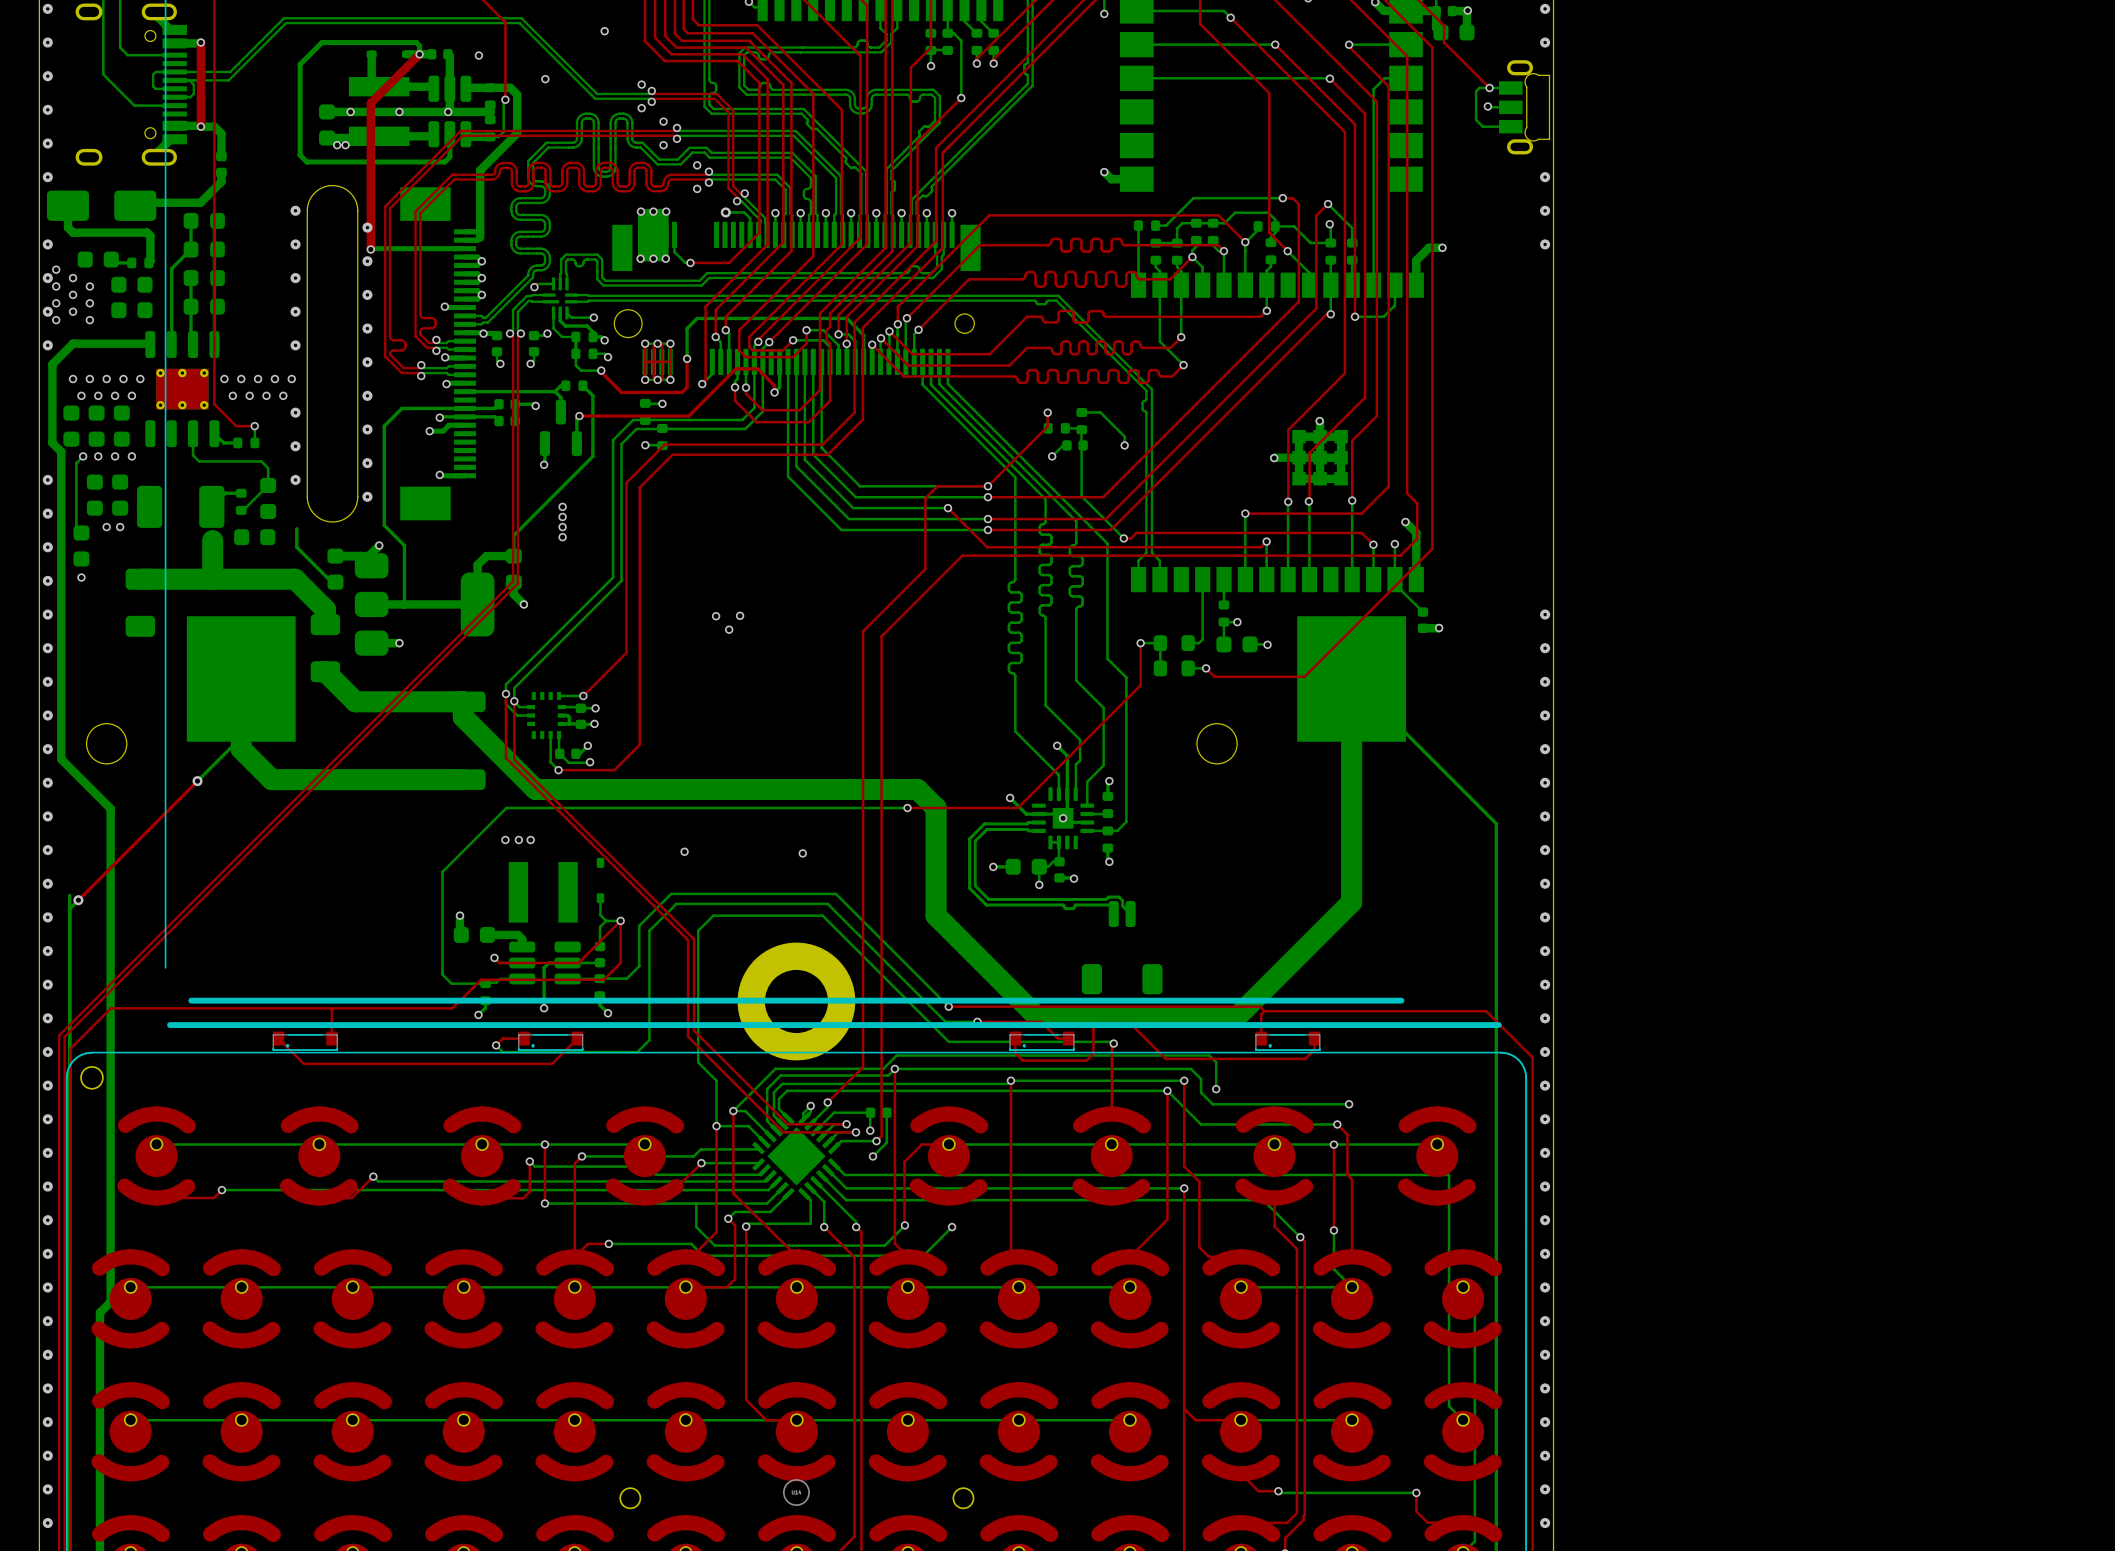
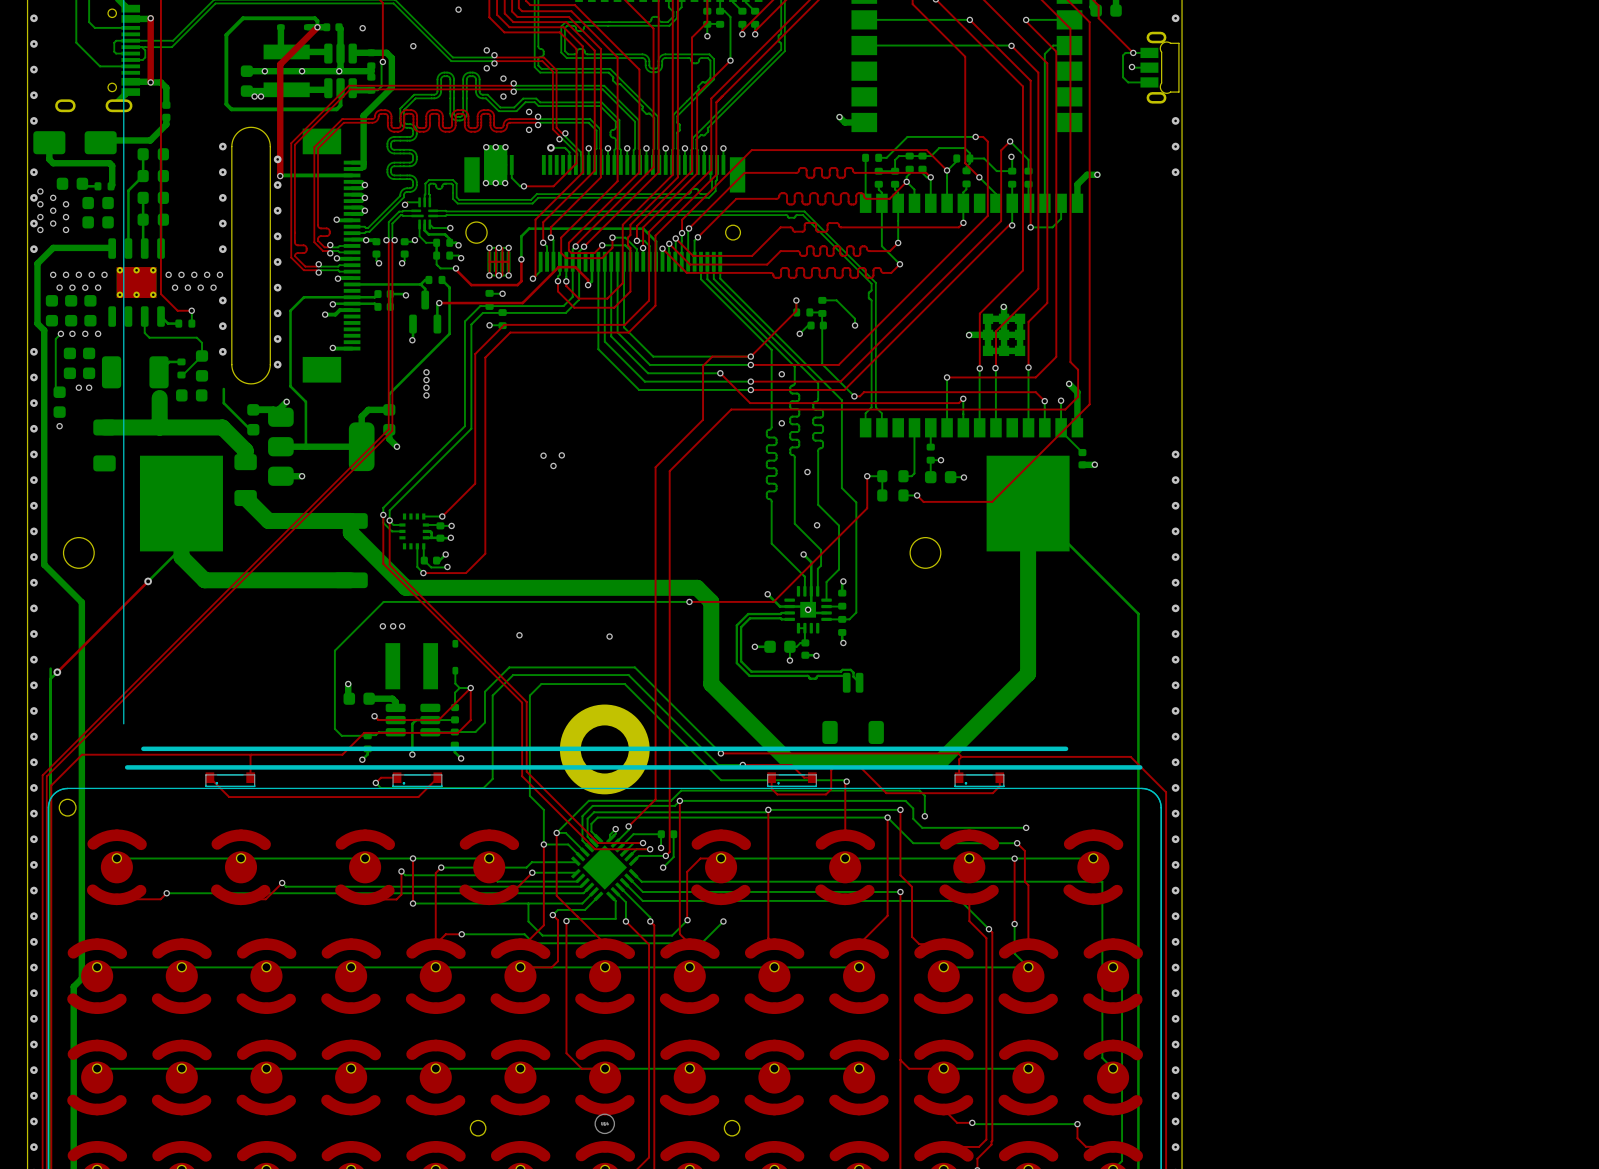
via: none -> (781, 374)
via: none -> (781, 423)
via: none -> (807, 472)
via: none -> (817, 525)

